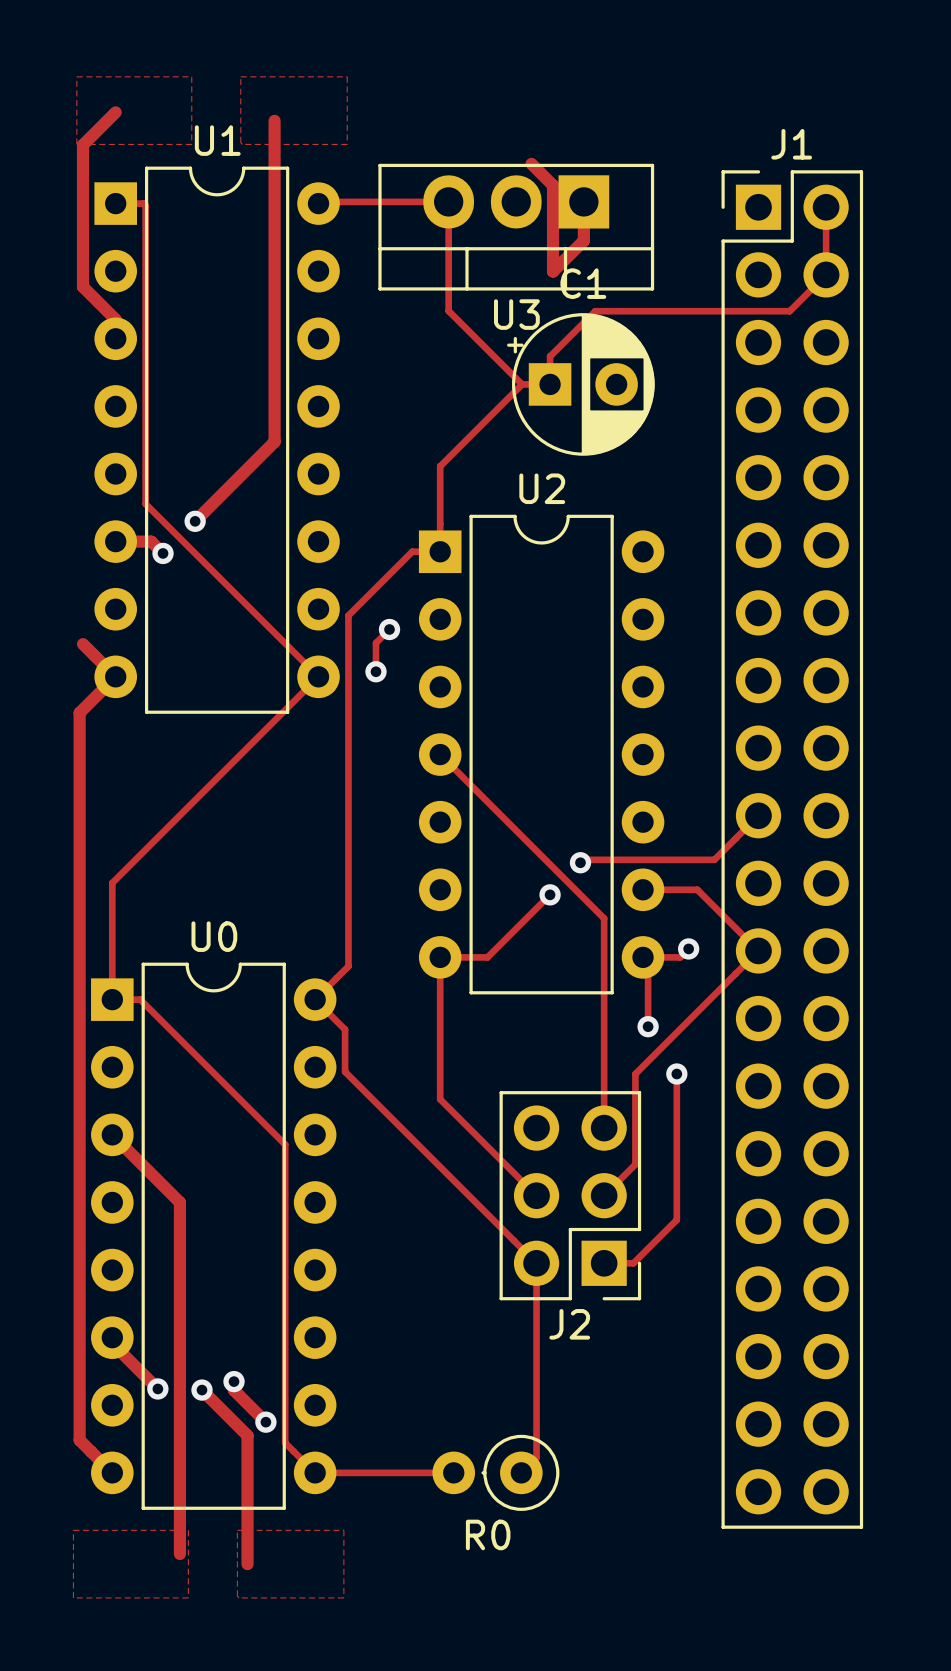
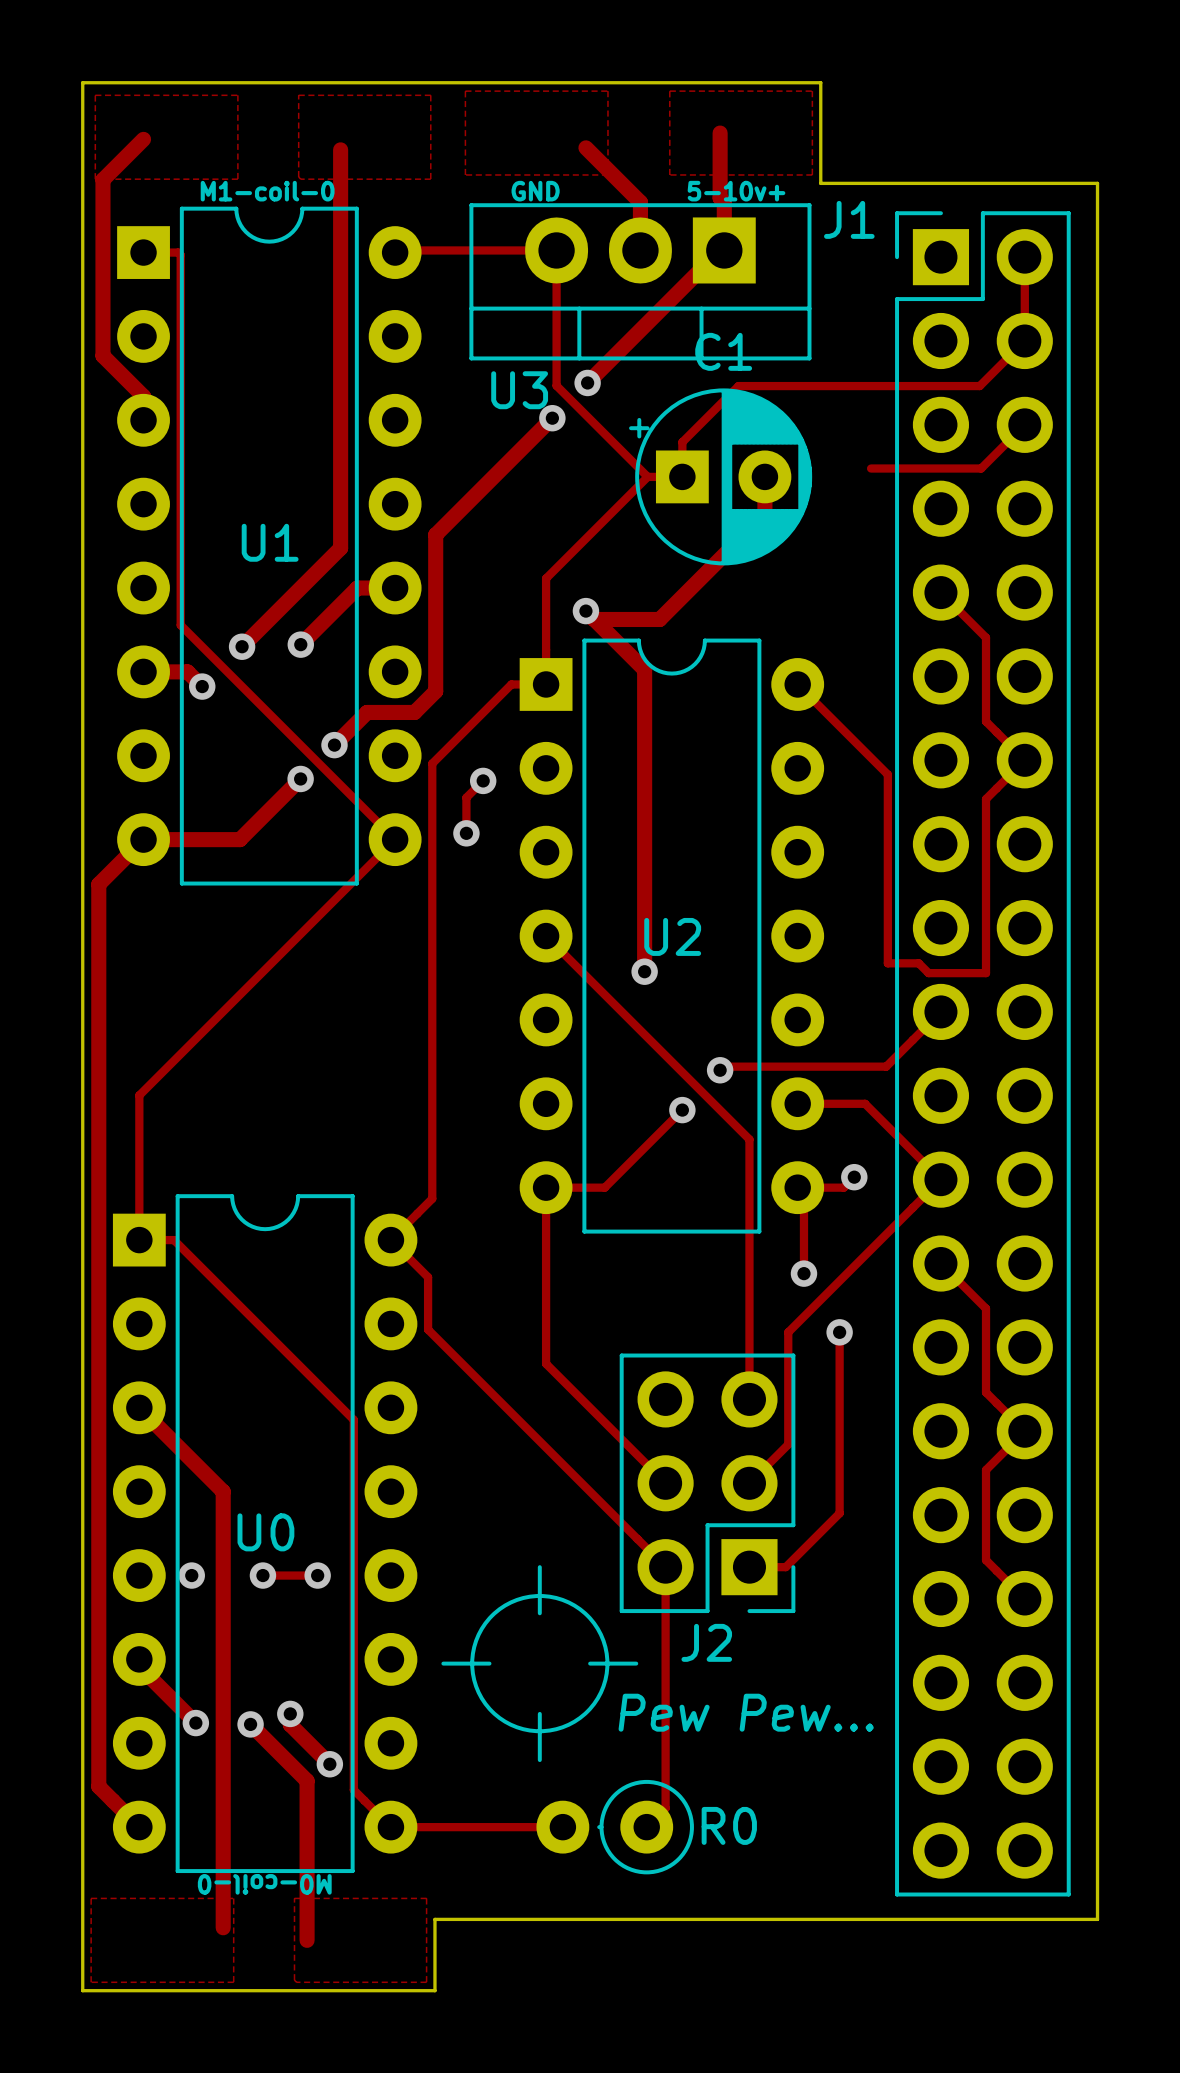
board edge: none -> (82, 82) (820, 82) (820, 183) (1097, 183) (1097, 1919) (434, 1919) (434, 1990) (82, 1990) (82, 82)
zone outline: none -> (465, 91) (465, 174) (607, 174) (607, 91) (465, 91)
zone outline: none -> (669, 91) (812, 91) (812, 174) (669, 174) (669, 91)
track: none -> (720, 133) (720, 198) (724, 202) (724, 250) (720, 250) (587, 382)
track: none -> (585, 147) (640, 202) (640, 250)
U1 name position: U1 (217, 140) -> U1 (270, 542)
J1 name position: J1 (791, 144) -> J1 (849, 219)
text: none -> M1-coil-0 (267, 191)
text: none -> GND (535, 191)
text: none -> 5-10v+ (736, 191)
track: (531, 163) (553, 185) (553, 271) (583, 240) (583, 201) -> none
via: none -> (587, 382)
U3 name position: U3 (516, 314) -> U3 (519, 390)
track: none -> (552, 418) (435, 534) (435, 691) (414, 712) (367, 712) (334, 745)
via: none -> (552, 418)
track: none -> (1024, 424) (981, 468) (871, 468)
track: none -> (764, 476) (764, 514) (659, 619) (594, 619)
track: none -> (395, 588) (357, 588) (300, 644)
track: none -> (940, 592) (986, 637) (986, 721) (1024, 760) (986, 799) (986, 973) (928, 973) (918, 963) (887, 963) (887, 774) (797, 684)
U2 name position: U2 (542, 488) -> U2 (672, 936)
track: none -> (585, 611) (644, 669) (644, 971)
via: none -> (585, 611)
via: none -> (300, 644)
via: none -> (334, 745)
via: none -> (300, 778)
track: (83, 644) (115, 676) -> (300, 778) (239, 839) (143, 839)
via: none -> (644, 971)
U0 name position: U0 (214, 936) -> U0 (265, 1532)
track: none -> (940, 1263) (986, 1308) (986, 1392) (1024, 1431) (986, 1470) (986, 1560) (1024, 1598)
line: none -> (539, 1567) (539, 1613)
via: none -> (191, 1575)
track: none -> (262, 1575) (317, 1575)
via: none -> (262, 1575)
via: none -> (317, 1575)
drawing: none -> [470, 1594, 610, 1734]
line: none -> (443, 1663) (489, 1663)
line: none -> (590, 1663) (636, 1663)
text: none -> Pew Pew... (746, 1712)
line: none -> (539, 1713) (539, 1760)
text: none -> M0-coil-0 (264, 1884)
R0 name position: R0 (488, 1534) -> R0 (729, 1825)

